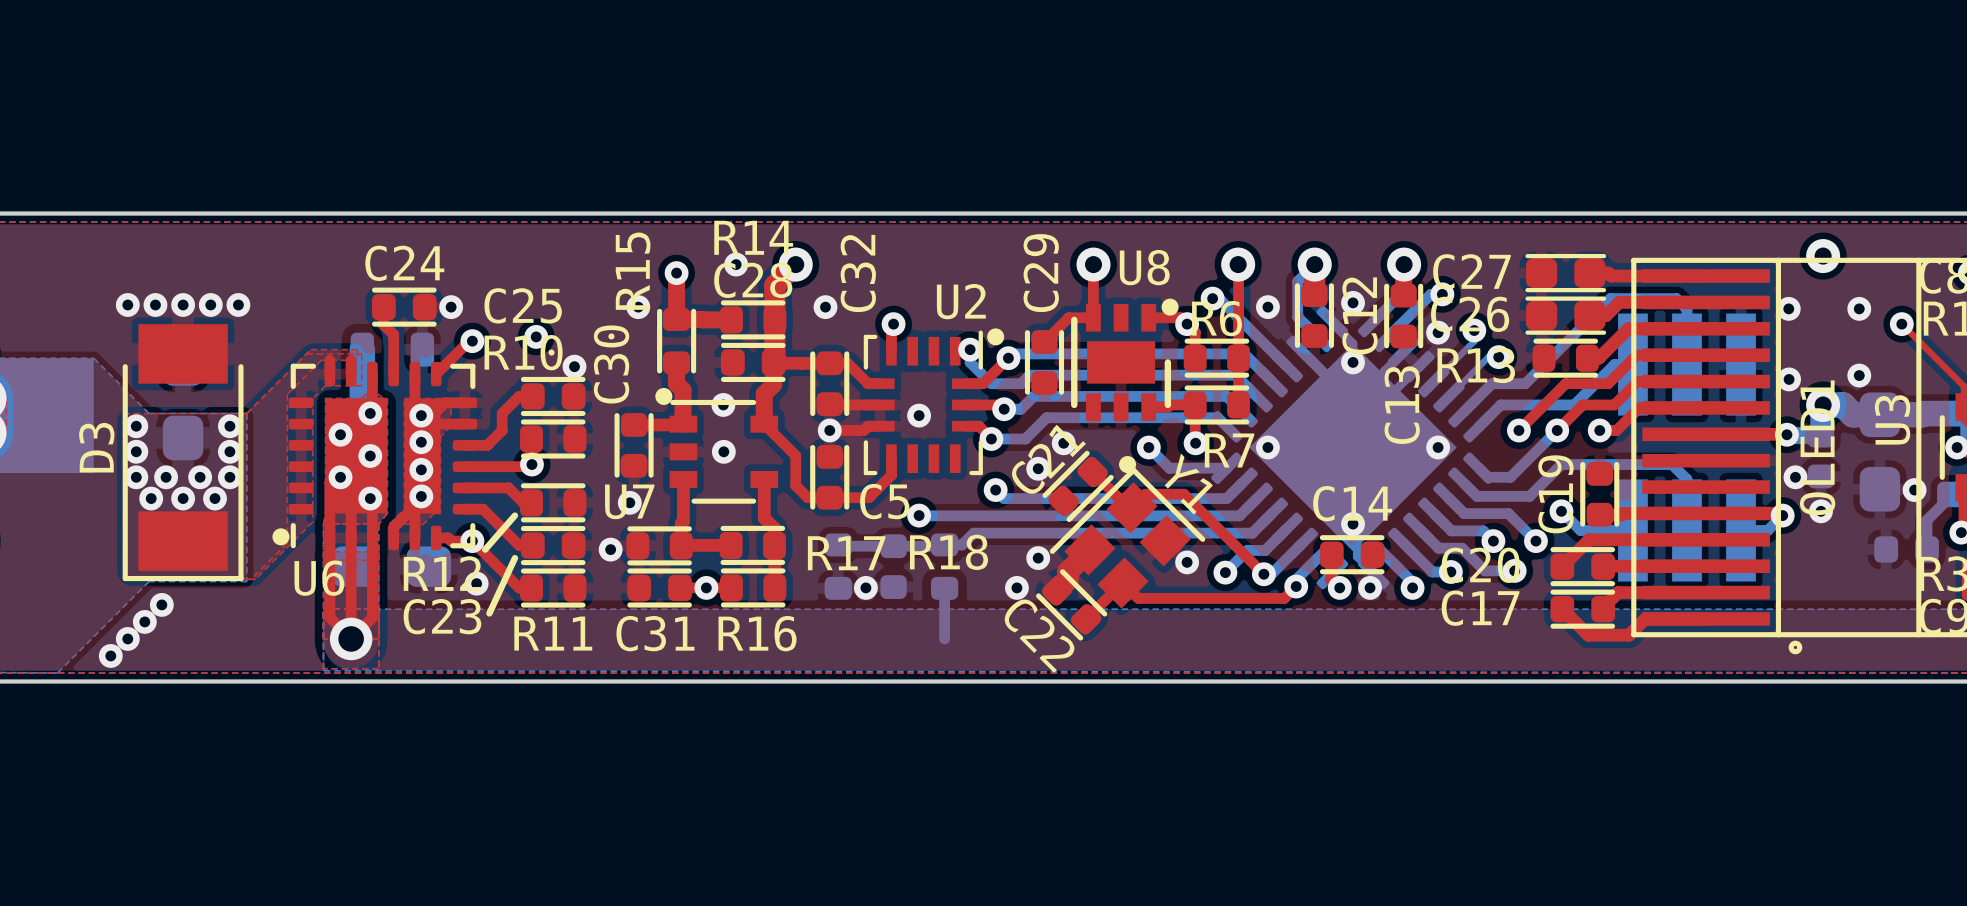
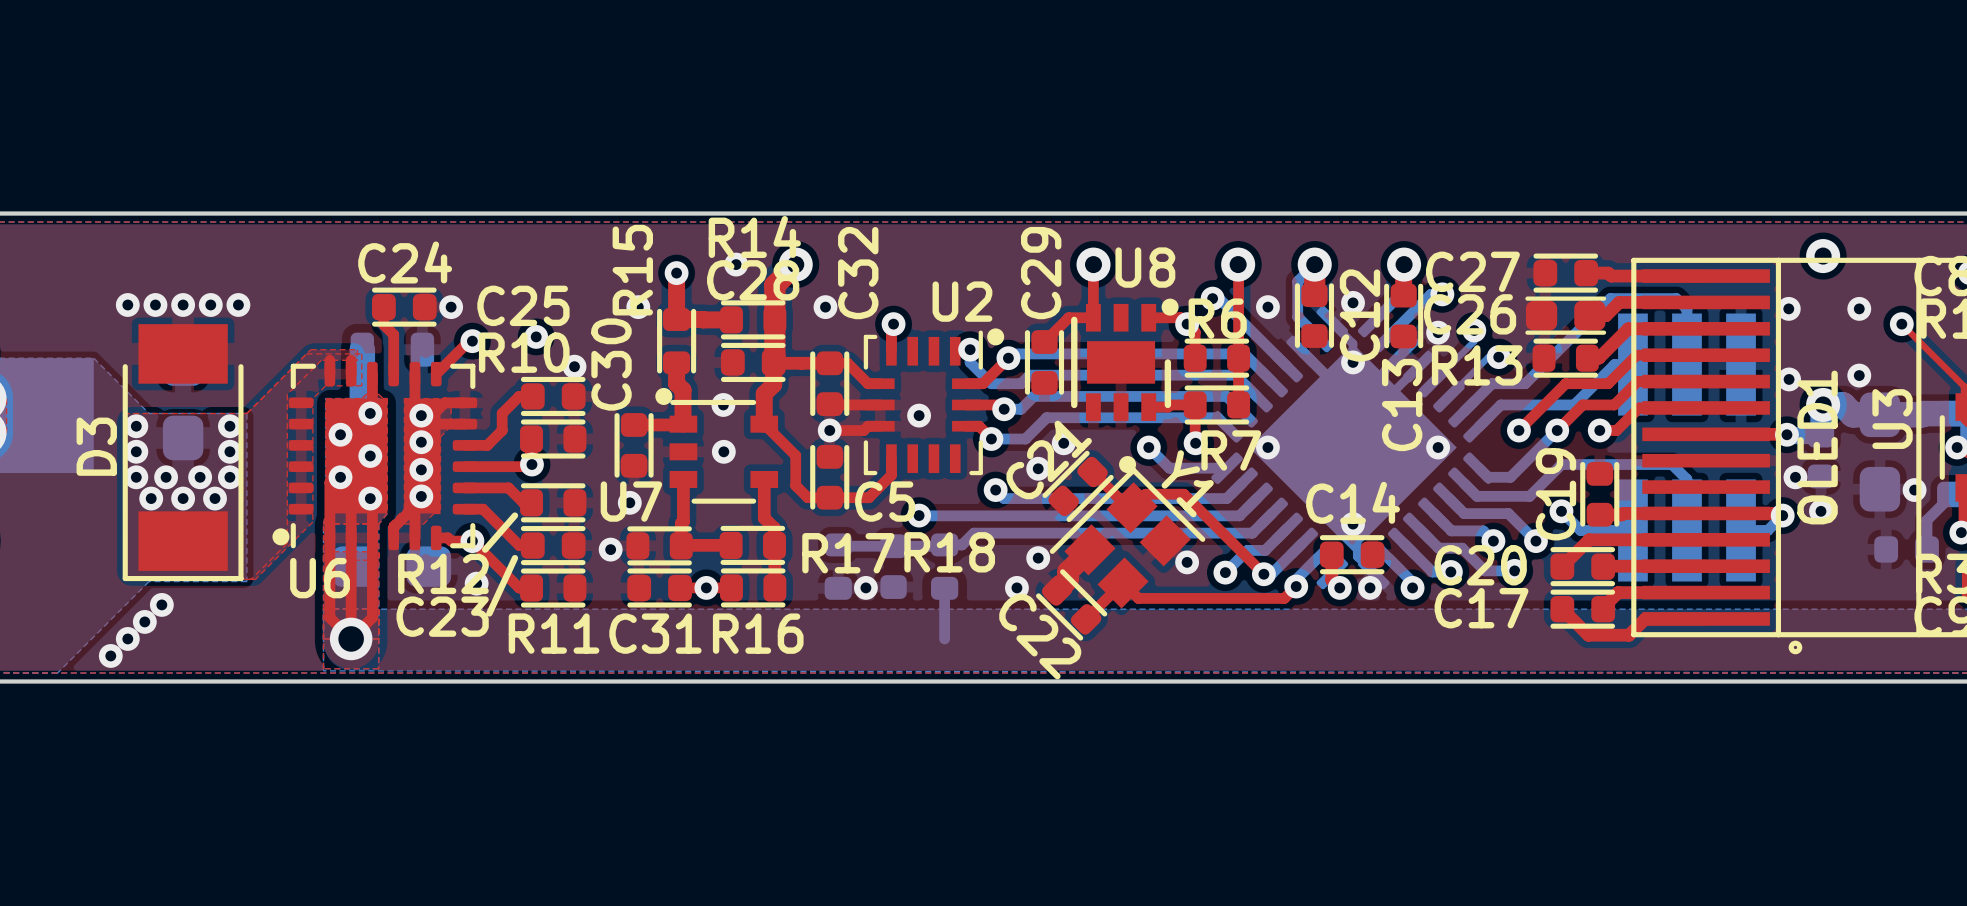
C27 footprint: [1525, 253, 1607, 293] -> [1533, 253, 1599, 293]

